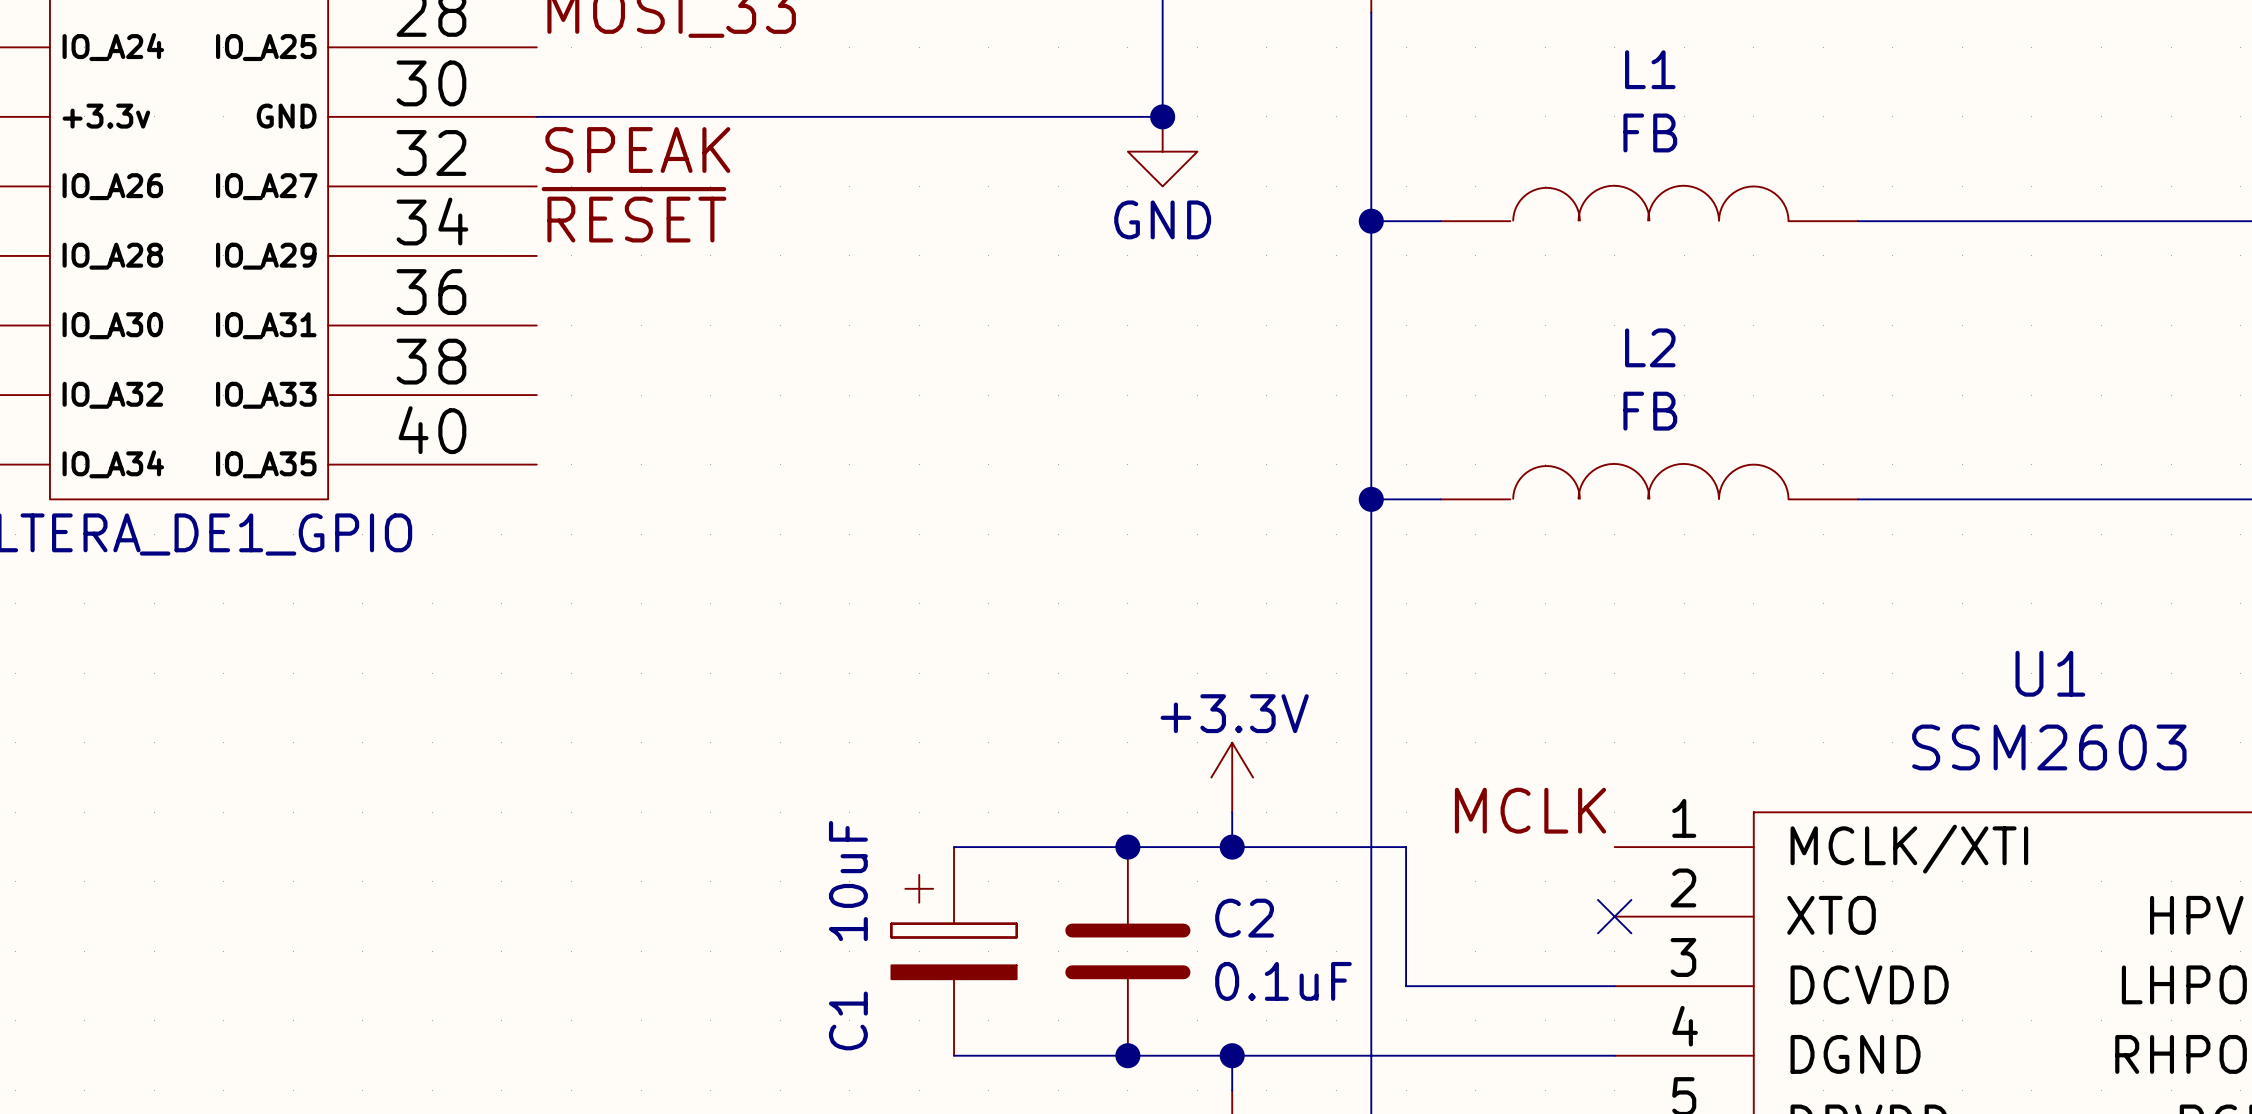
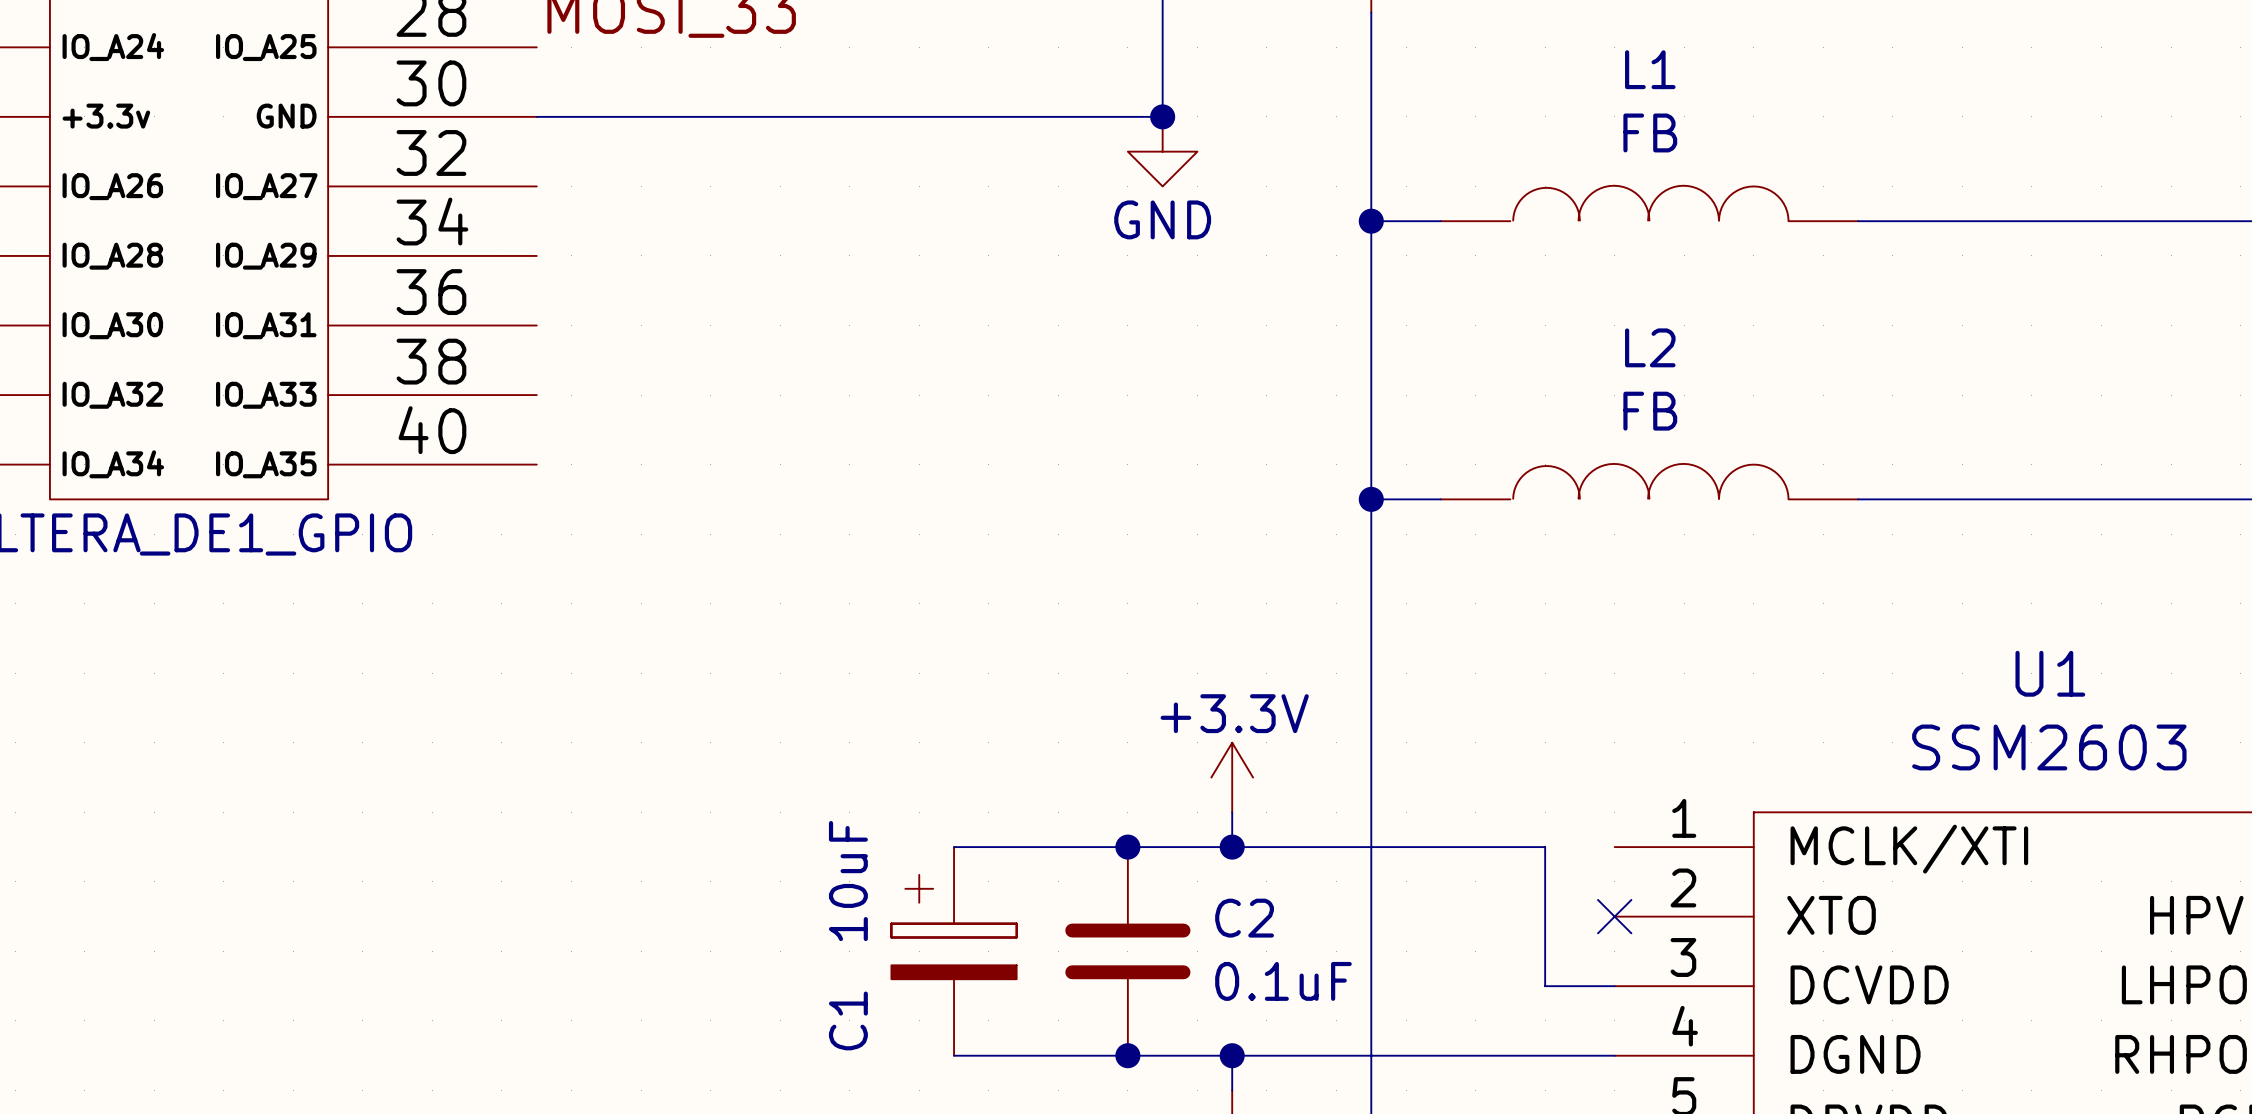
label: SPEAK (637, 150) -> none
label: ~{RESET} (633, 214) -> none
label: MCLK (1530, 810) -> none
wire: (1406, 847) (1406, 986) (1545, 986) -> (1406, 847) (1545, 847) (1545, 986)

